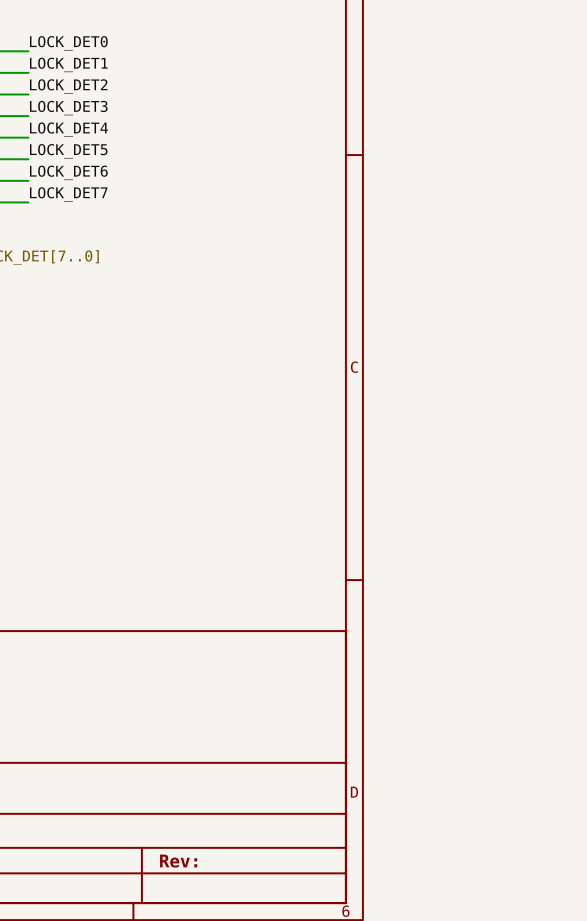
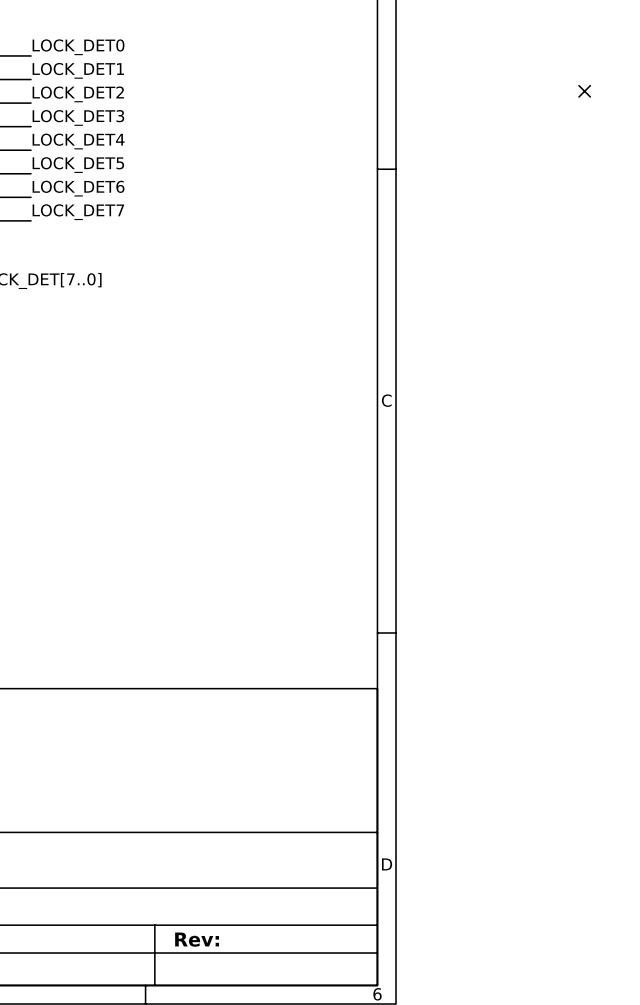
no-connect mark: none -> (584, 91)

